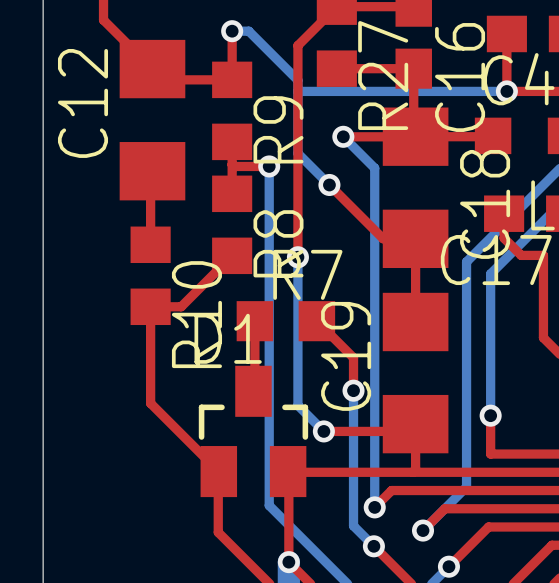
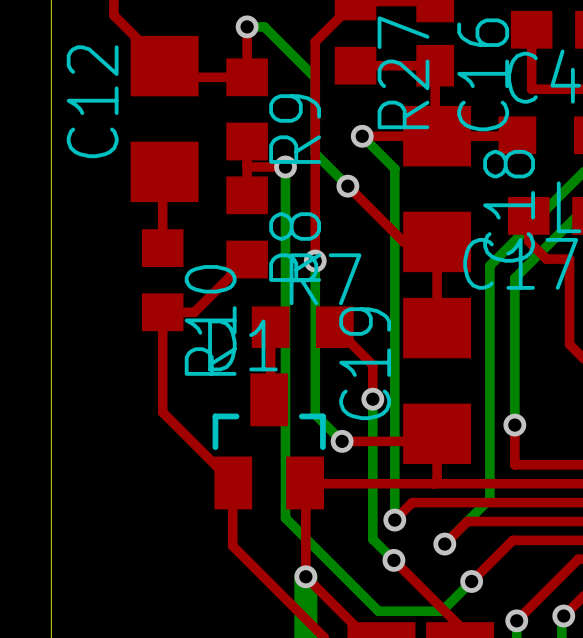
bottom track: (297, 91) (506, 91) -> none
via: (506, 91) -> none

